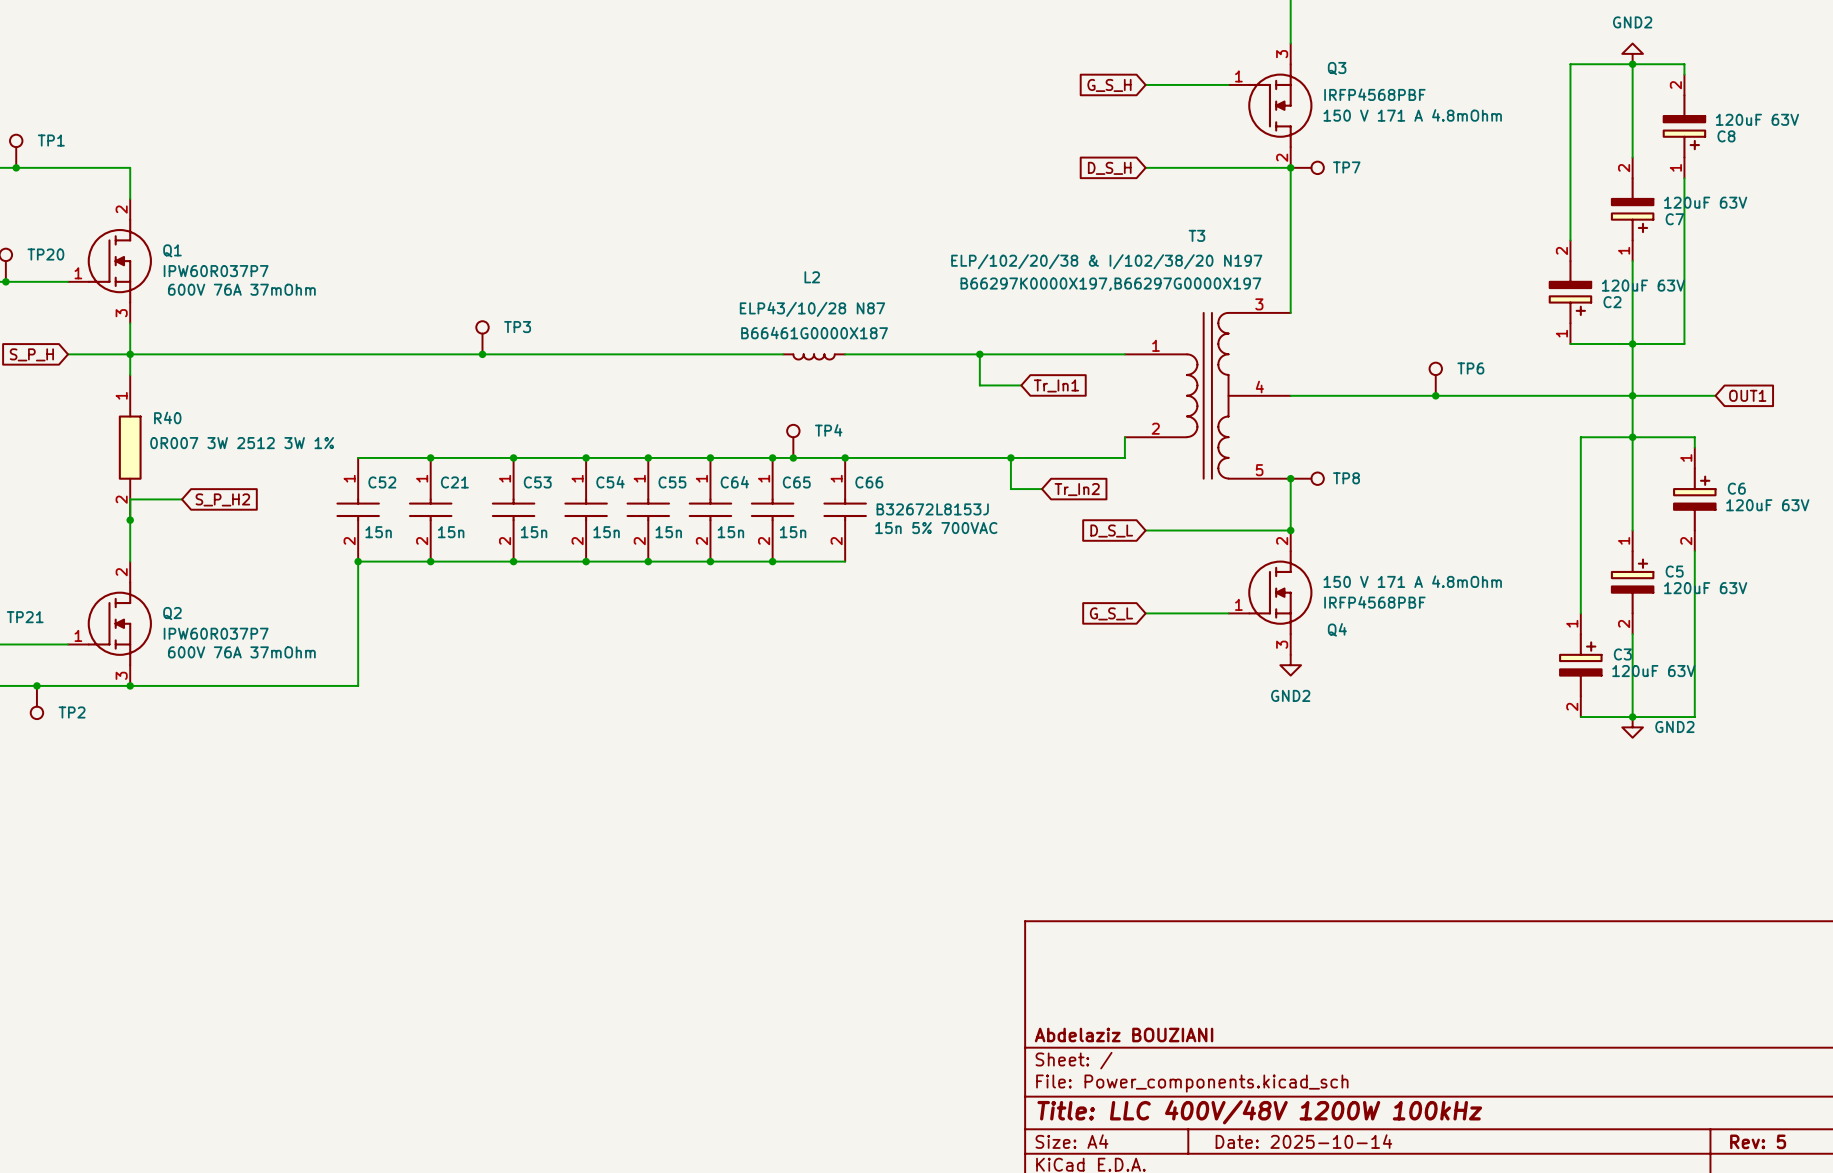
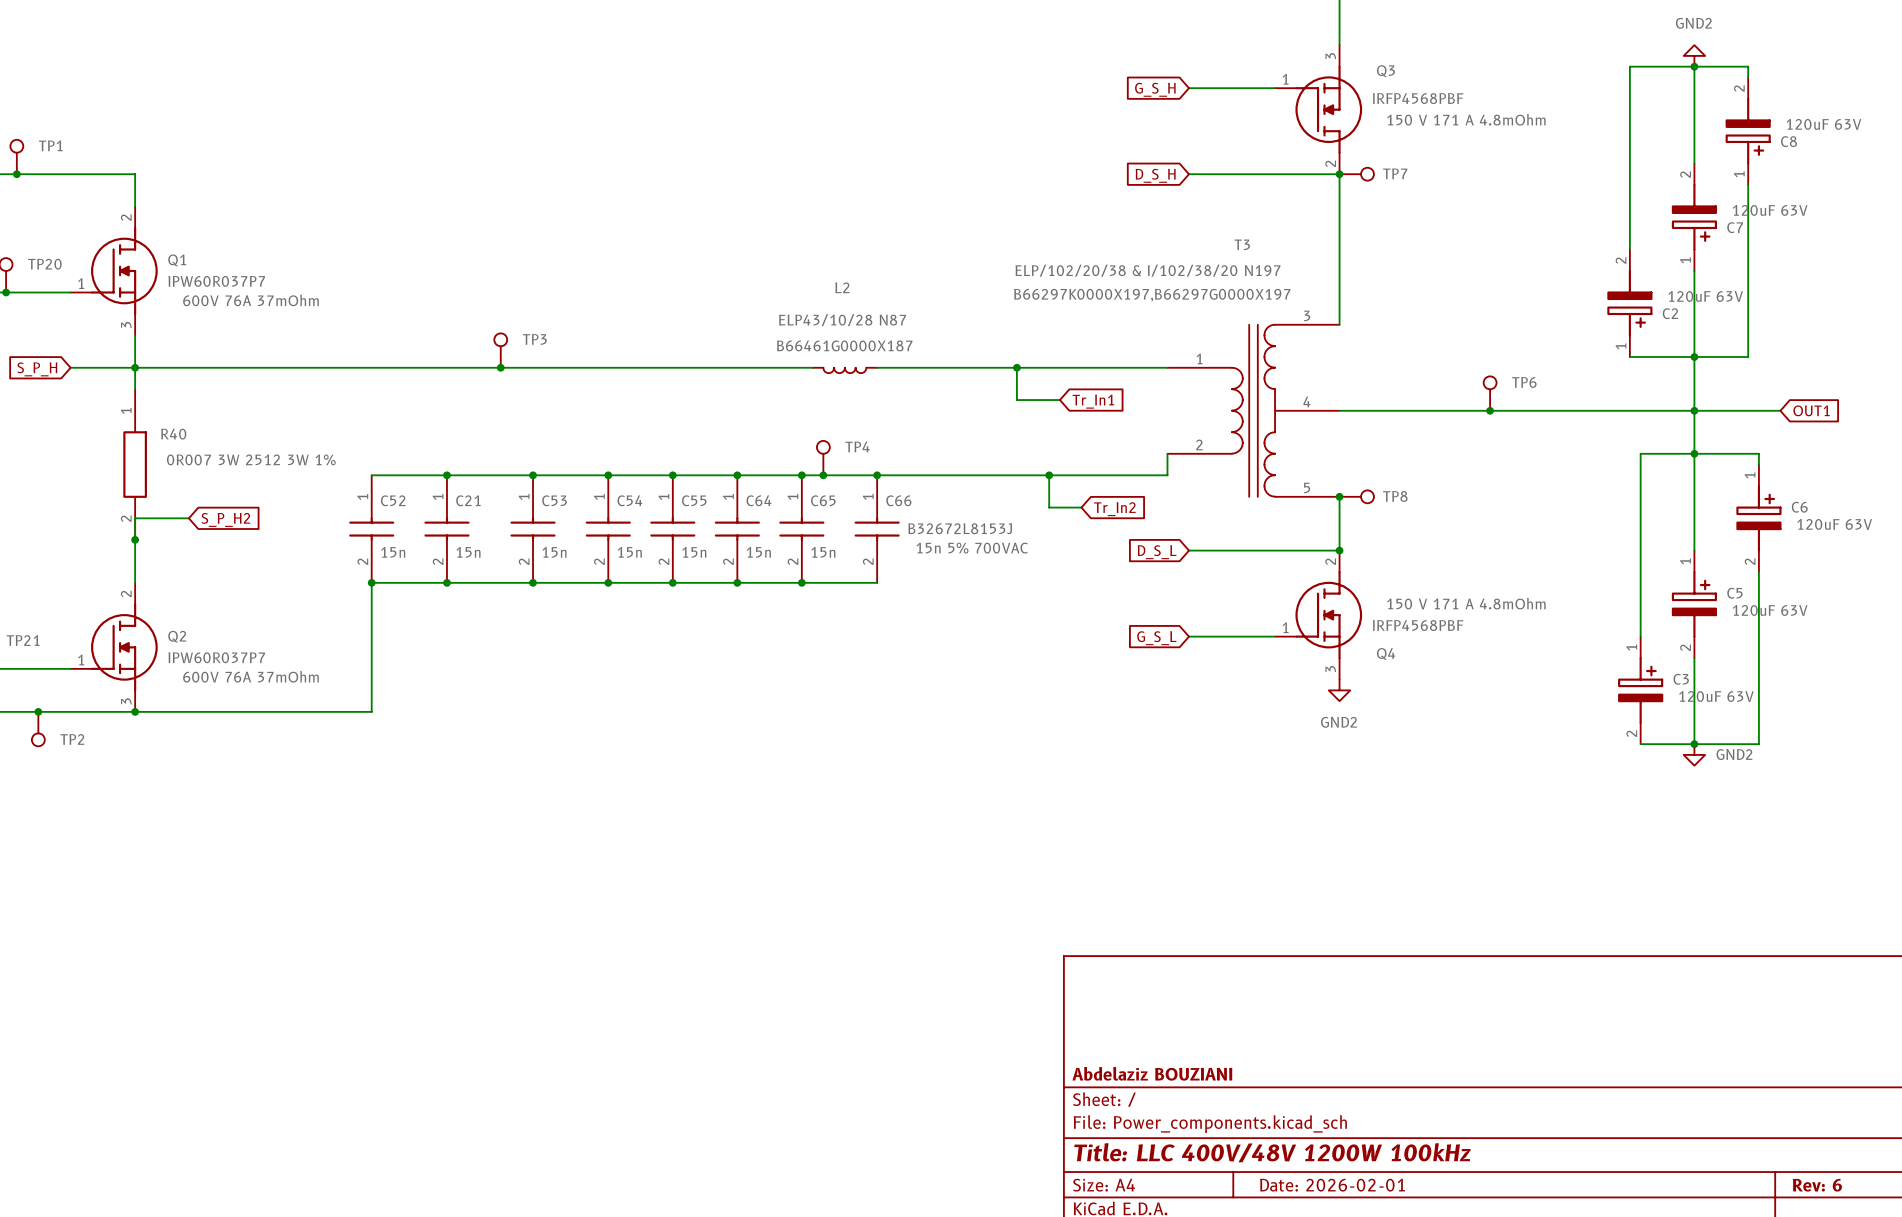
title block: Date: 2025-10-14 (1303, 1141) -> Date: 2026-02-01 (1332, 1185)
title block: Rev: 5 (1758, 1141) -> Rev: 6 (1817, 1185)

